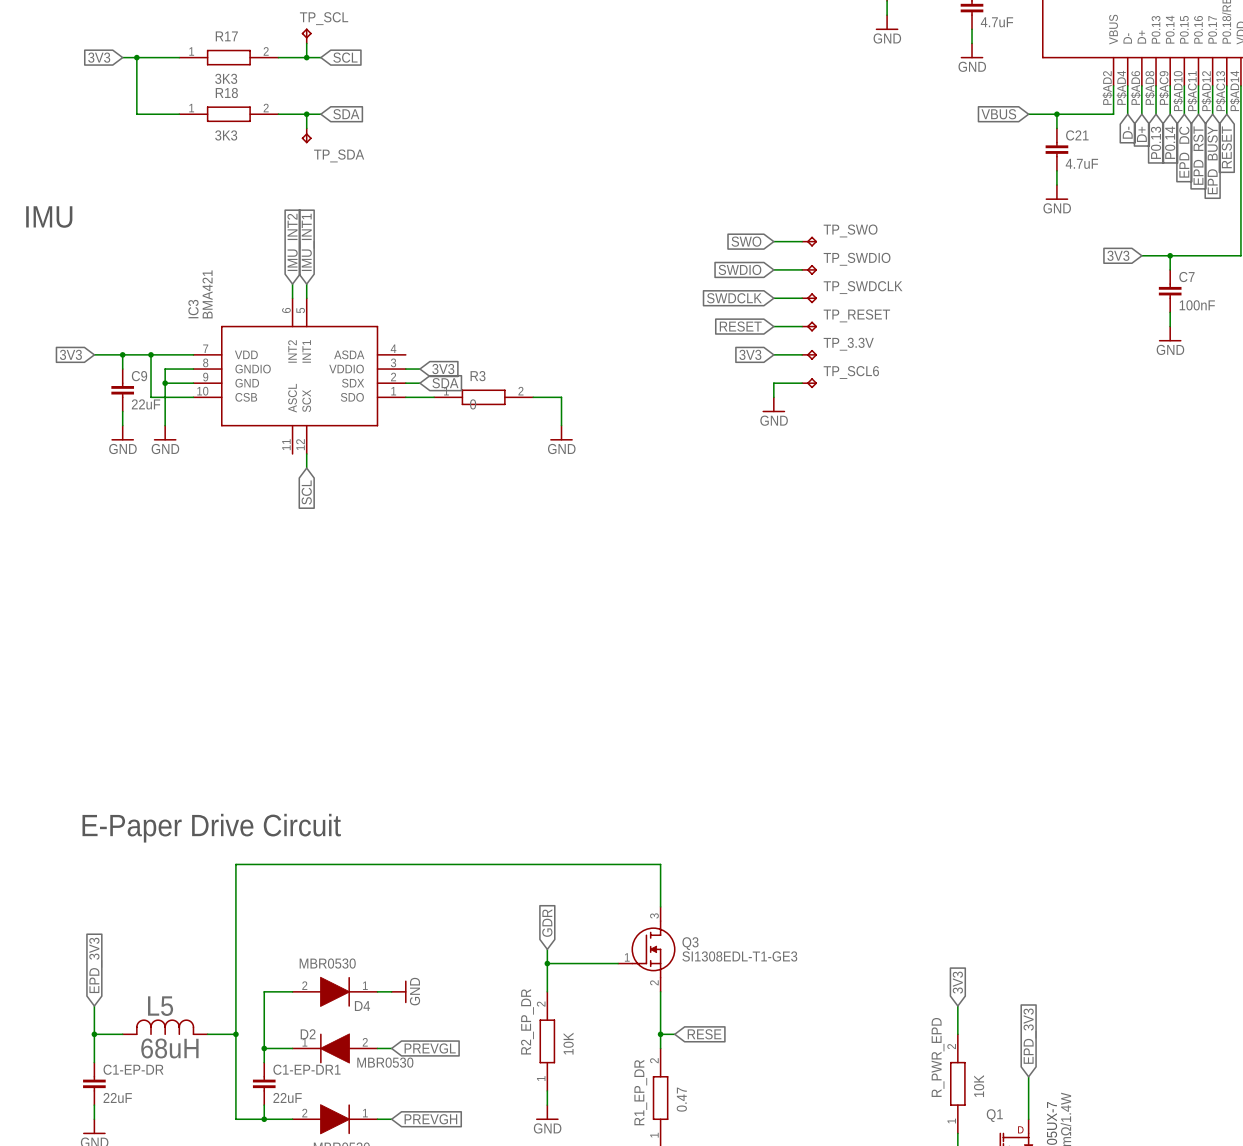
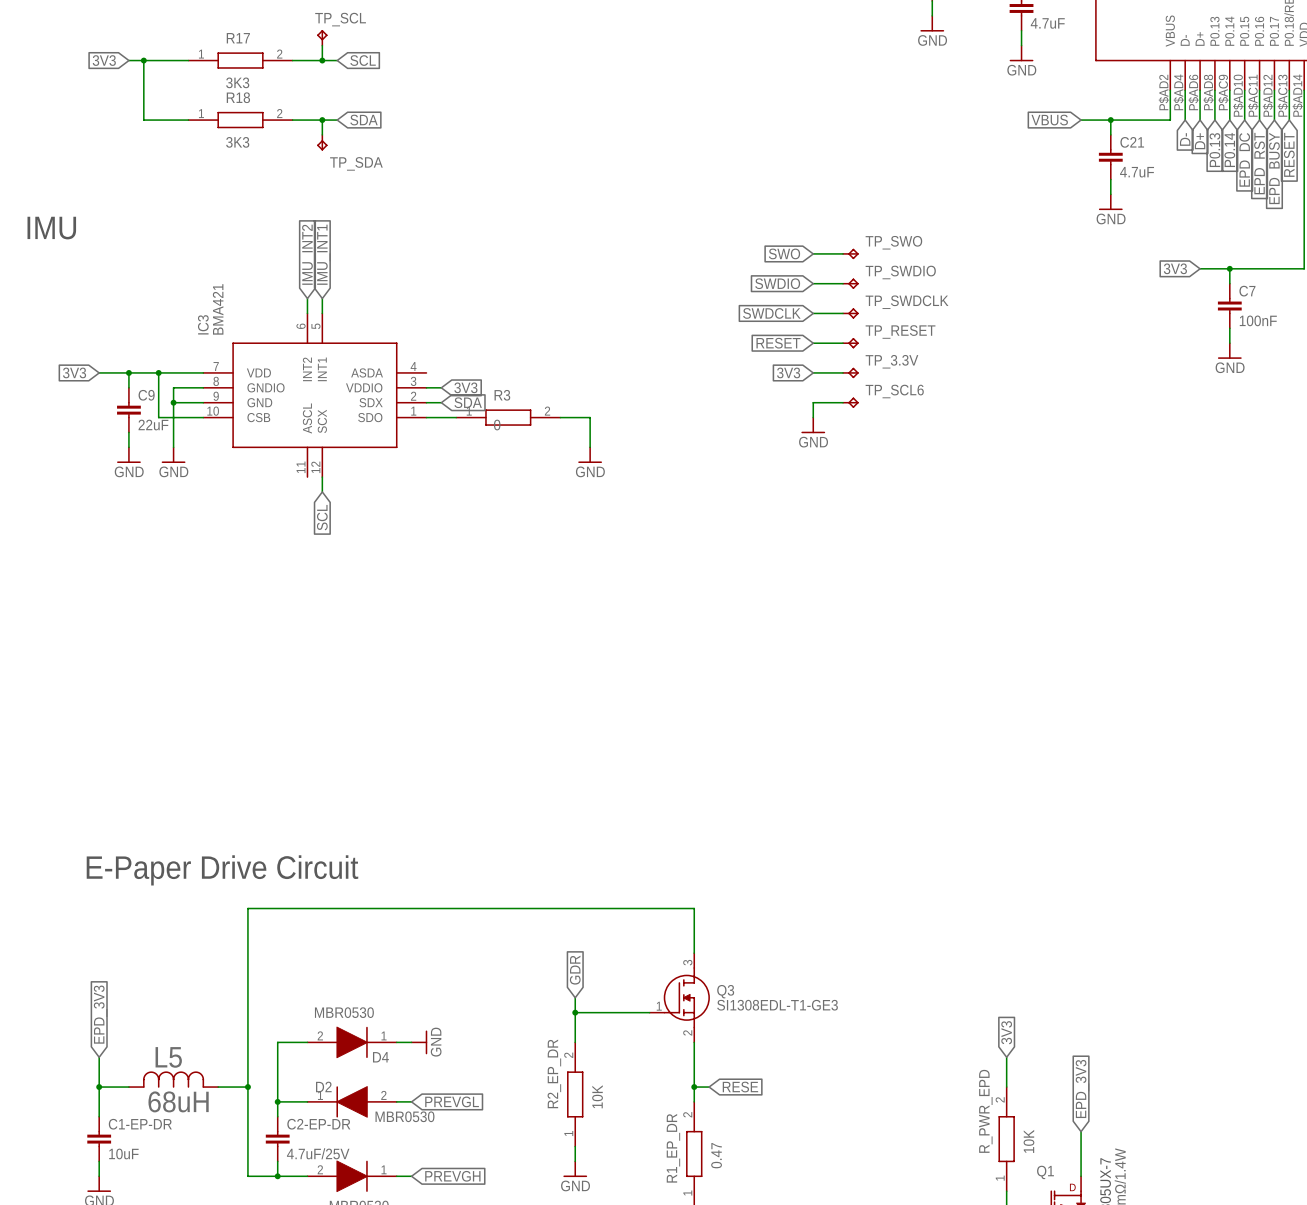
C1-EP-DR1 name: C1-EP-DR1 (306, 1069) -> C2-EP-DR (318, 1124)
C1-EP-DR value: 22uF (117, 1098) -> 10uF (123, 1153)
C1-EP-DR1 value: 22uF (287, 1098) -> 4.7uF/25V (318, 1153)

